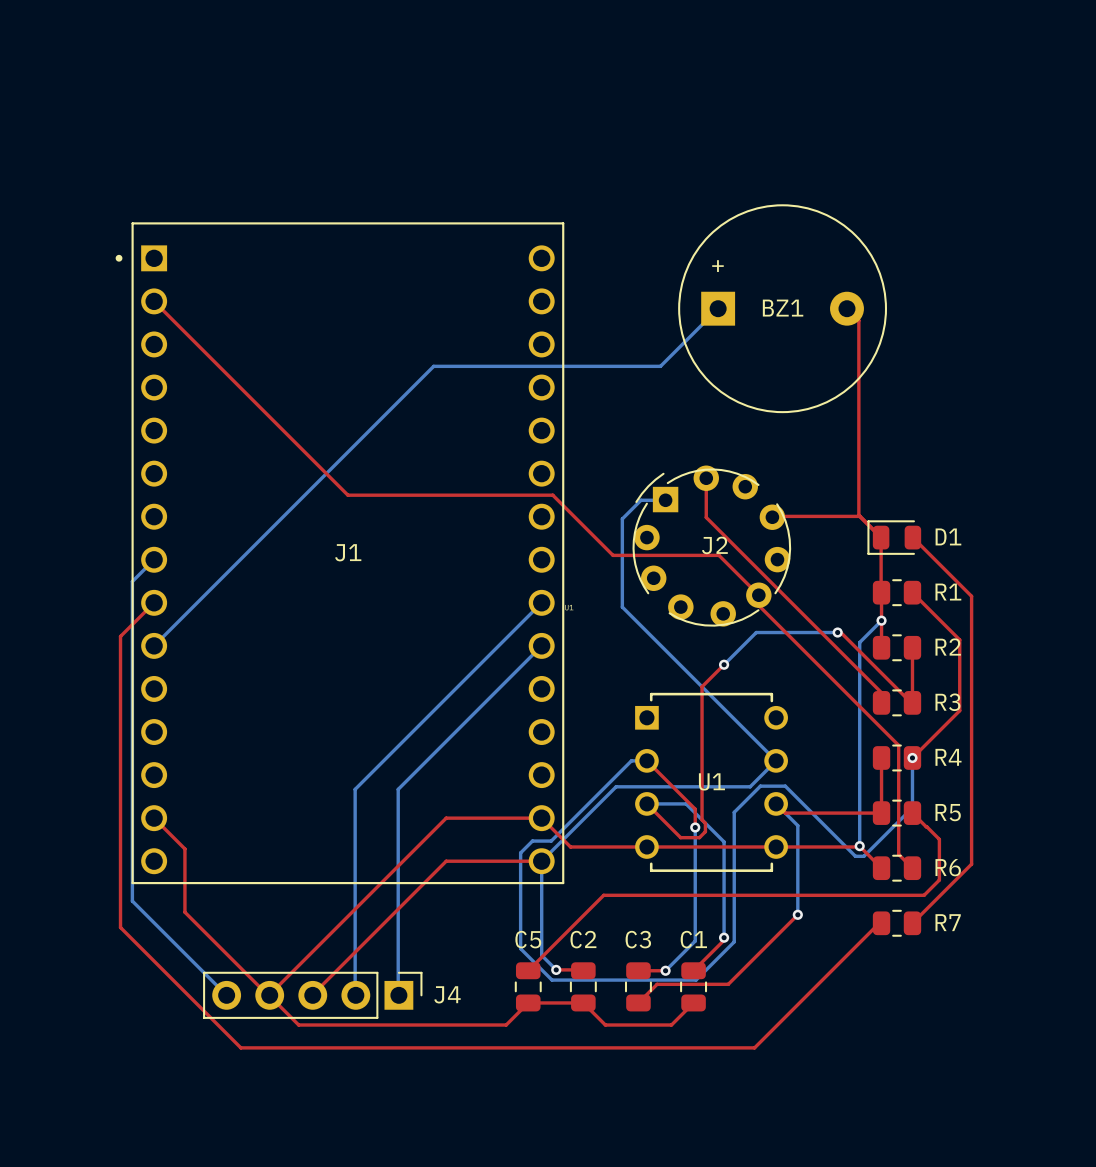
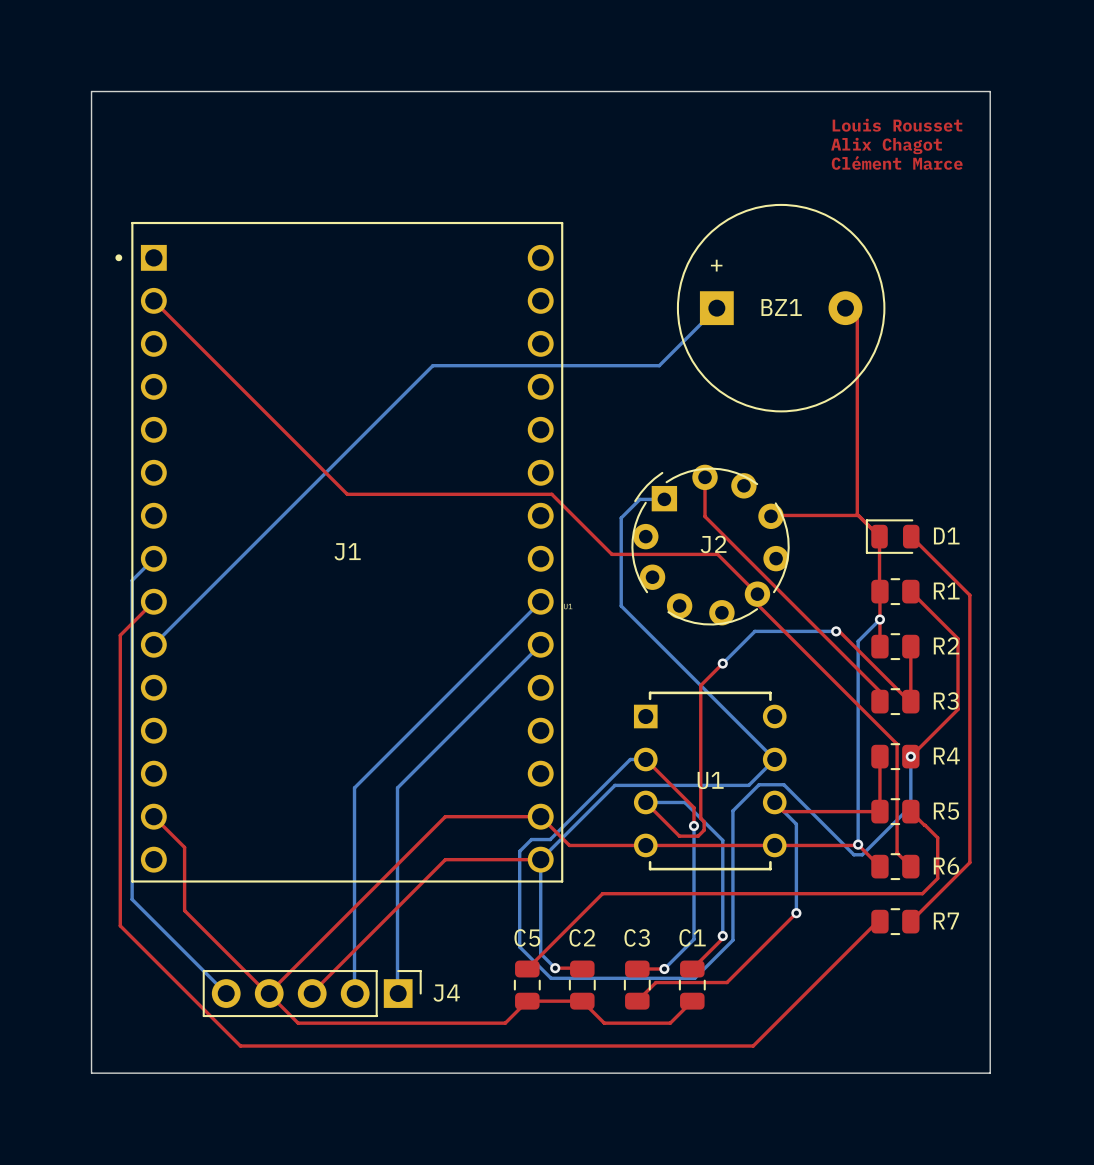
board edge: none -> (91, 91) (990, 91) (990, 1073) (91, 1073) (91, 91)
text: none -> Louis Rousset (897, 125)
text: none -> Alix Chagot (886, 145)
text: none -> Clément Marce (897, 162)

